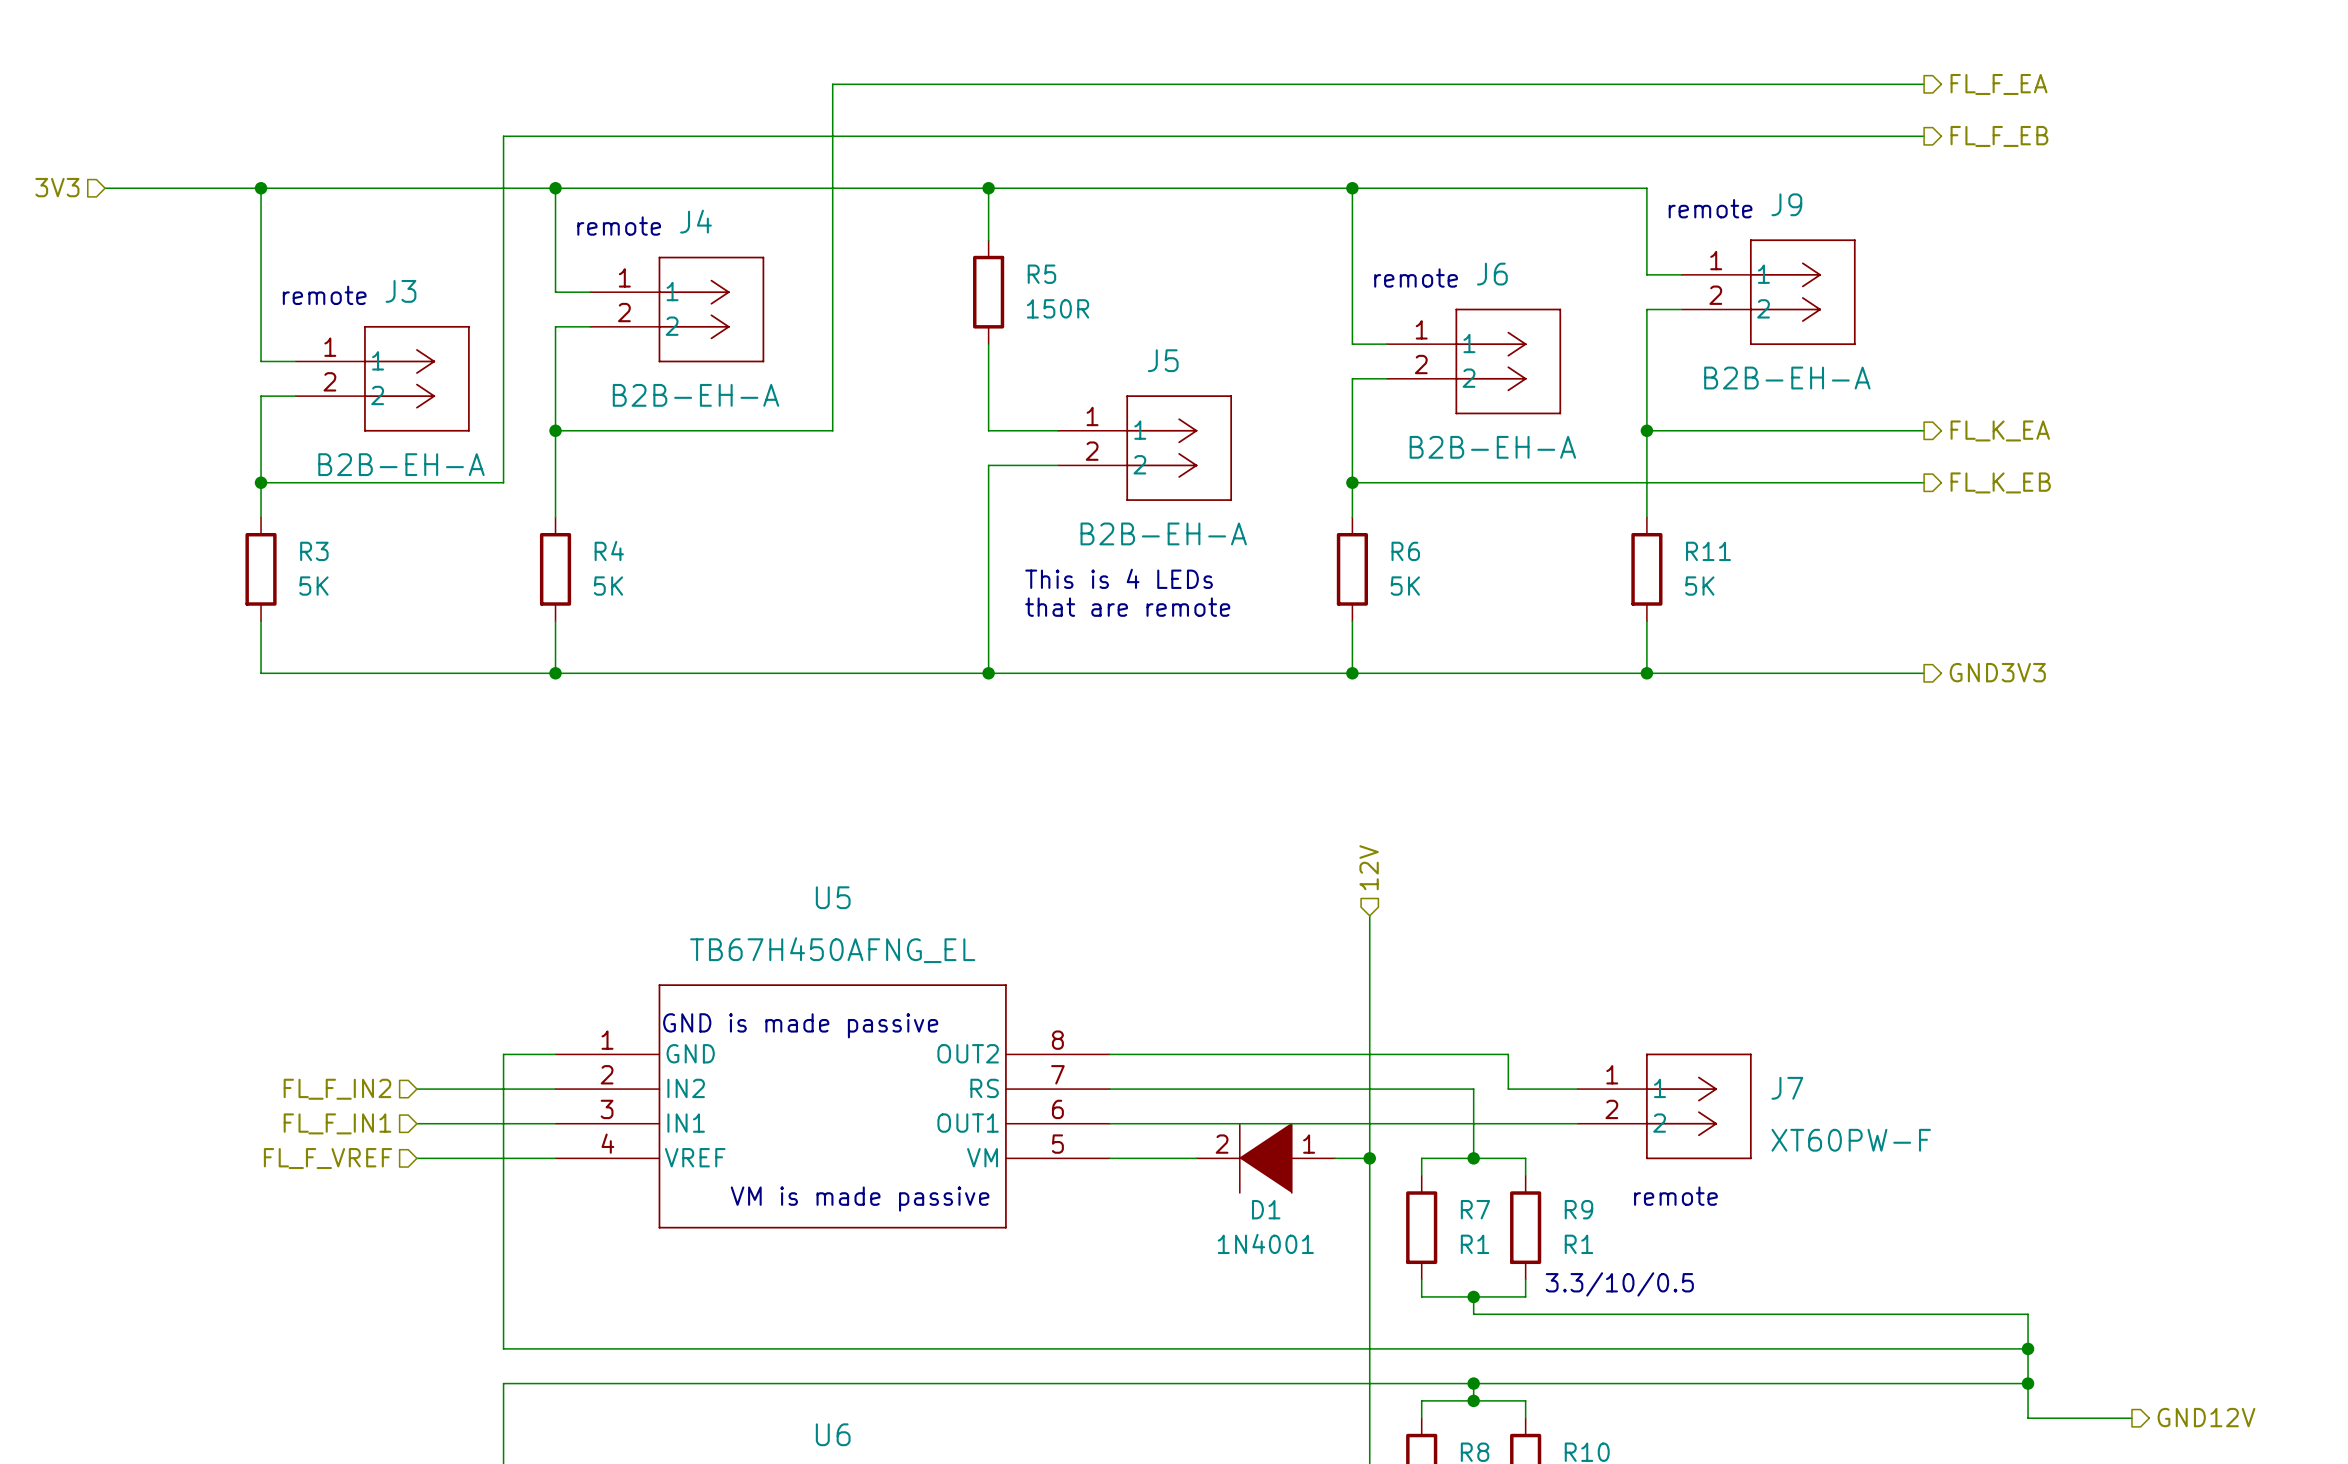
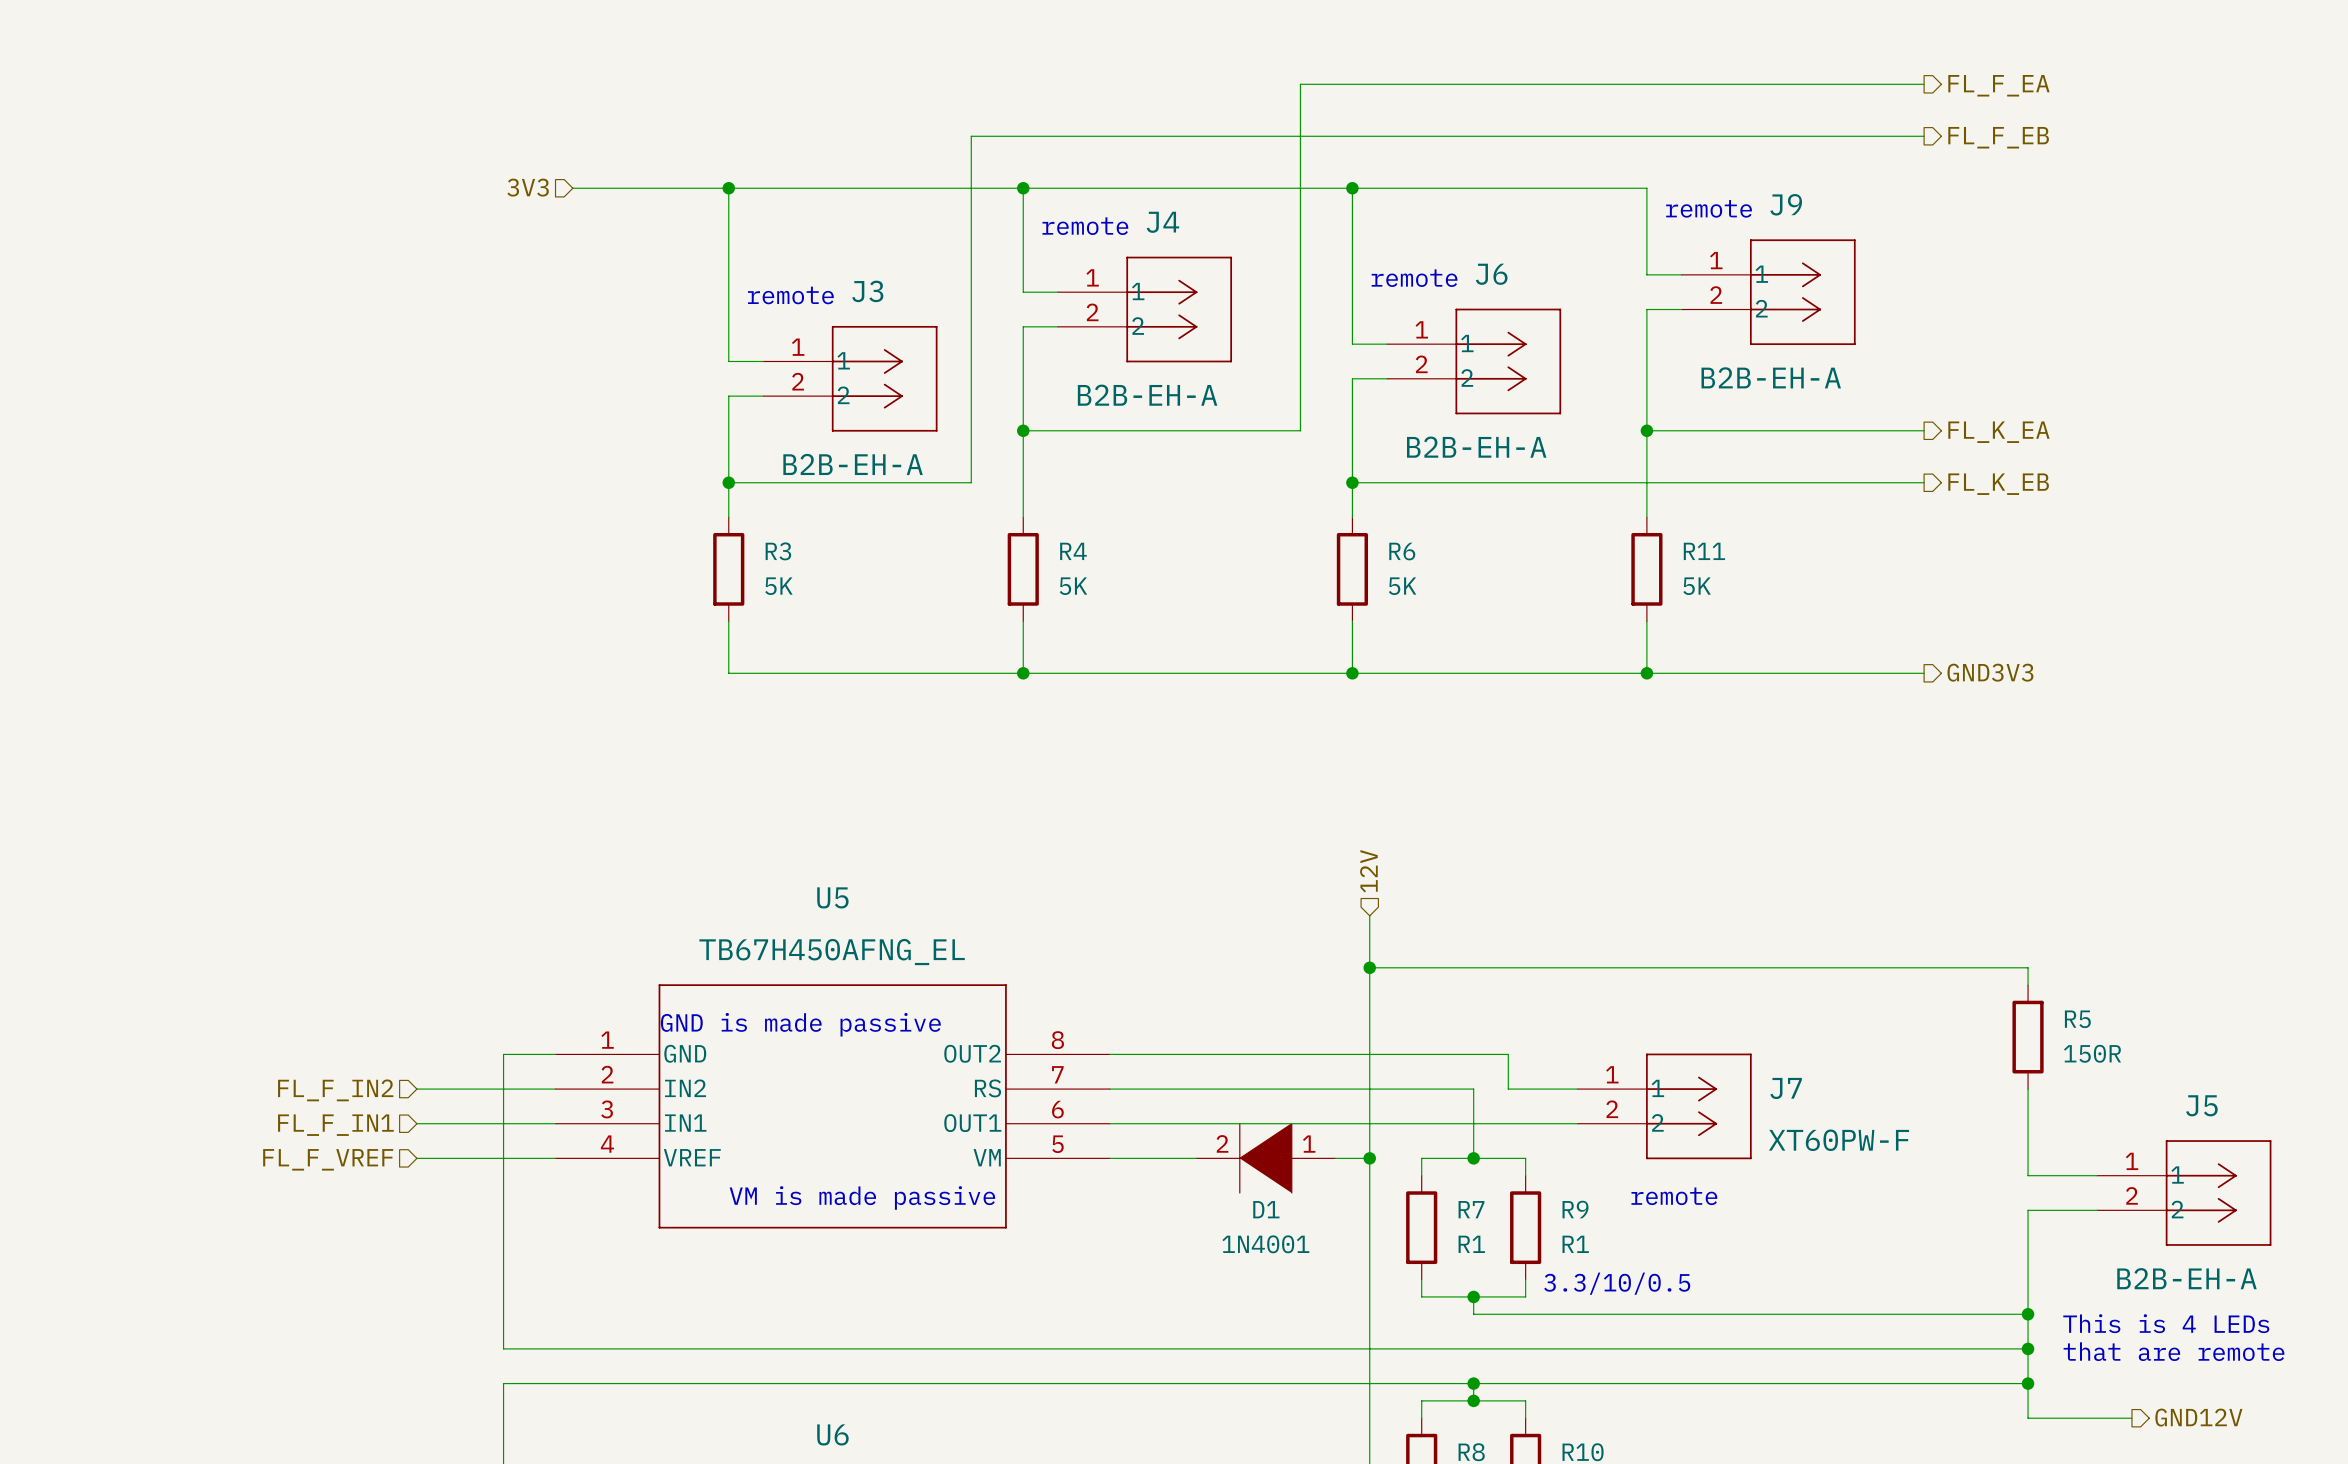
wire: (1300, 84) (832, 84) (832, 430) (555, 430) -> (1300, 84) (1300, 430) (1057, 430)
wire: (971, 136) (503, 136) (503, 482) (261, 482) -> (971, 136) (971, 482) (728, 482)
hierarchical label: 3V3 (57, 187) -> none
hierarchical label: none -> 3V3 (528, 187)
wire: (105, 188) (572, 188) -> none
wire: (261, 188) (261, 361) (295, 361) -> none
junction: (261, 188) -> none
wire: (555, 188) (555, 292) (590, 292) -> none
junction: (555, 188) -> none
wire: none -> (728, 188) (728, 361) (763, 361)
junction: none -> (728, 188)
wire: (988, 188) (988, 240) -> none
junction position: (988, 188) -> (1023, 188)
wire: none -> (1023, 188) (1023, 292) (1057, 292)
text position: remote (619, 226) -> remote (790, 295)
text: none -> remote (1085, 226)
R5 position: (988, 292) -> (2028, 1037)
text: remote (324, 295) -> none
J4 position: (677, 309) -> (1144, 309)
wire: (590, 326) (555, 326) (555, 517) -> none
wire: none -> (1057, 326) (1023, 326) (1023, 517)
wire: (988, 344) (988, 430) (1023, 430) -> none
J3 position: (382, 378) -> (850, 378)
wire: (295, 396) (261, 396) (261, 517) -> none
wire: none -> (763, 396) (728, 396) (728, 517)
junction: (555, 430) -> none
junction: none -> (1023, 430)
J5 position: (1144, 448) -> (2184, 1193)
wire: (1057, 465) (988, 465) (988, 673) -> none
junction: (261, 482) -> none
junction: none -> (728, 482)
R3 position: (261, 569) -> (728, 569)
R4 position: (555, 569) -> (1023, 569)
text: This is 4 LEDs (1119, 578) -> none
text: that are remote (1127, 607) -> none
wire: (261, 621) (261, 673) (728, 673) -> (728, 621) (728, 673)
wire: (555, 621) (555, 673) -> none
wire: none -> (1023, 621) (1023, 673)
junction: (555, 673) -> none
junction position: (988, 673) -> (1023, 673)
wire: none -> (1369, 967) (2028, 967) (2028, 985)
junction: none -> (1369, 967)
wire: none -> (2028, 1089) (2028, 1175) (2097, 1175)
wire: none -> (2097, 1210) (2028, 1210) (2028, 1314)
junction: none -> (2028, 1314)
text: none -> This is 4 LEDs (2166, 1323)
text: none -> that are remote (2174, 1351)

